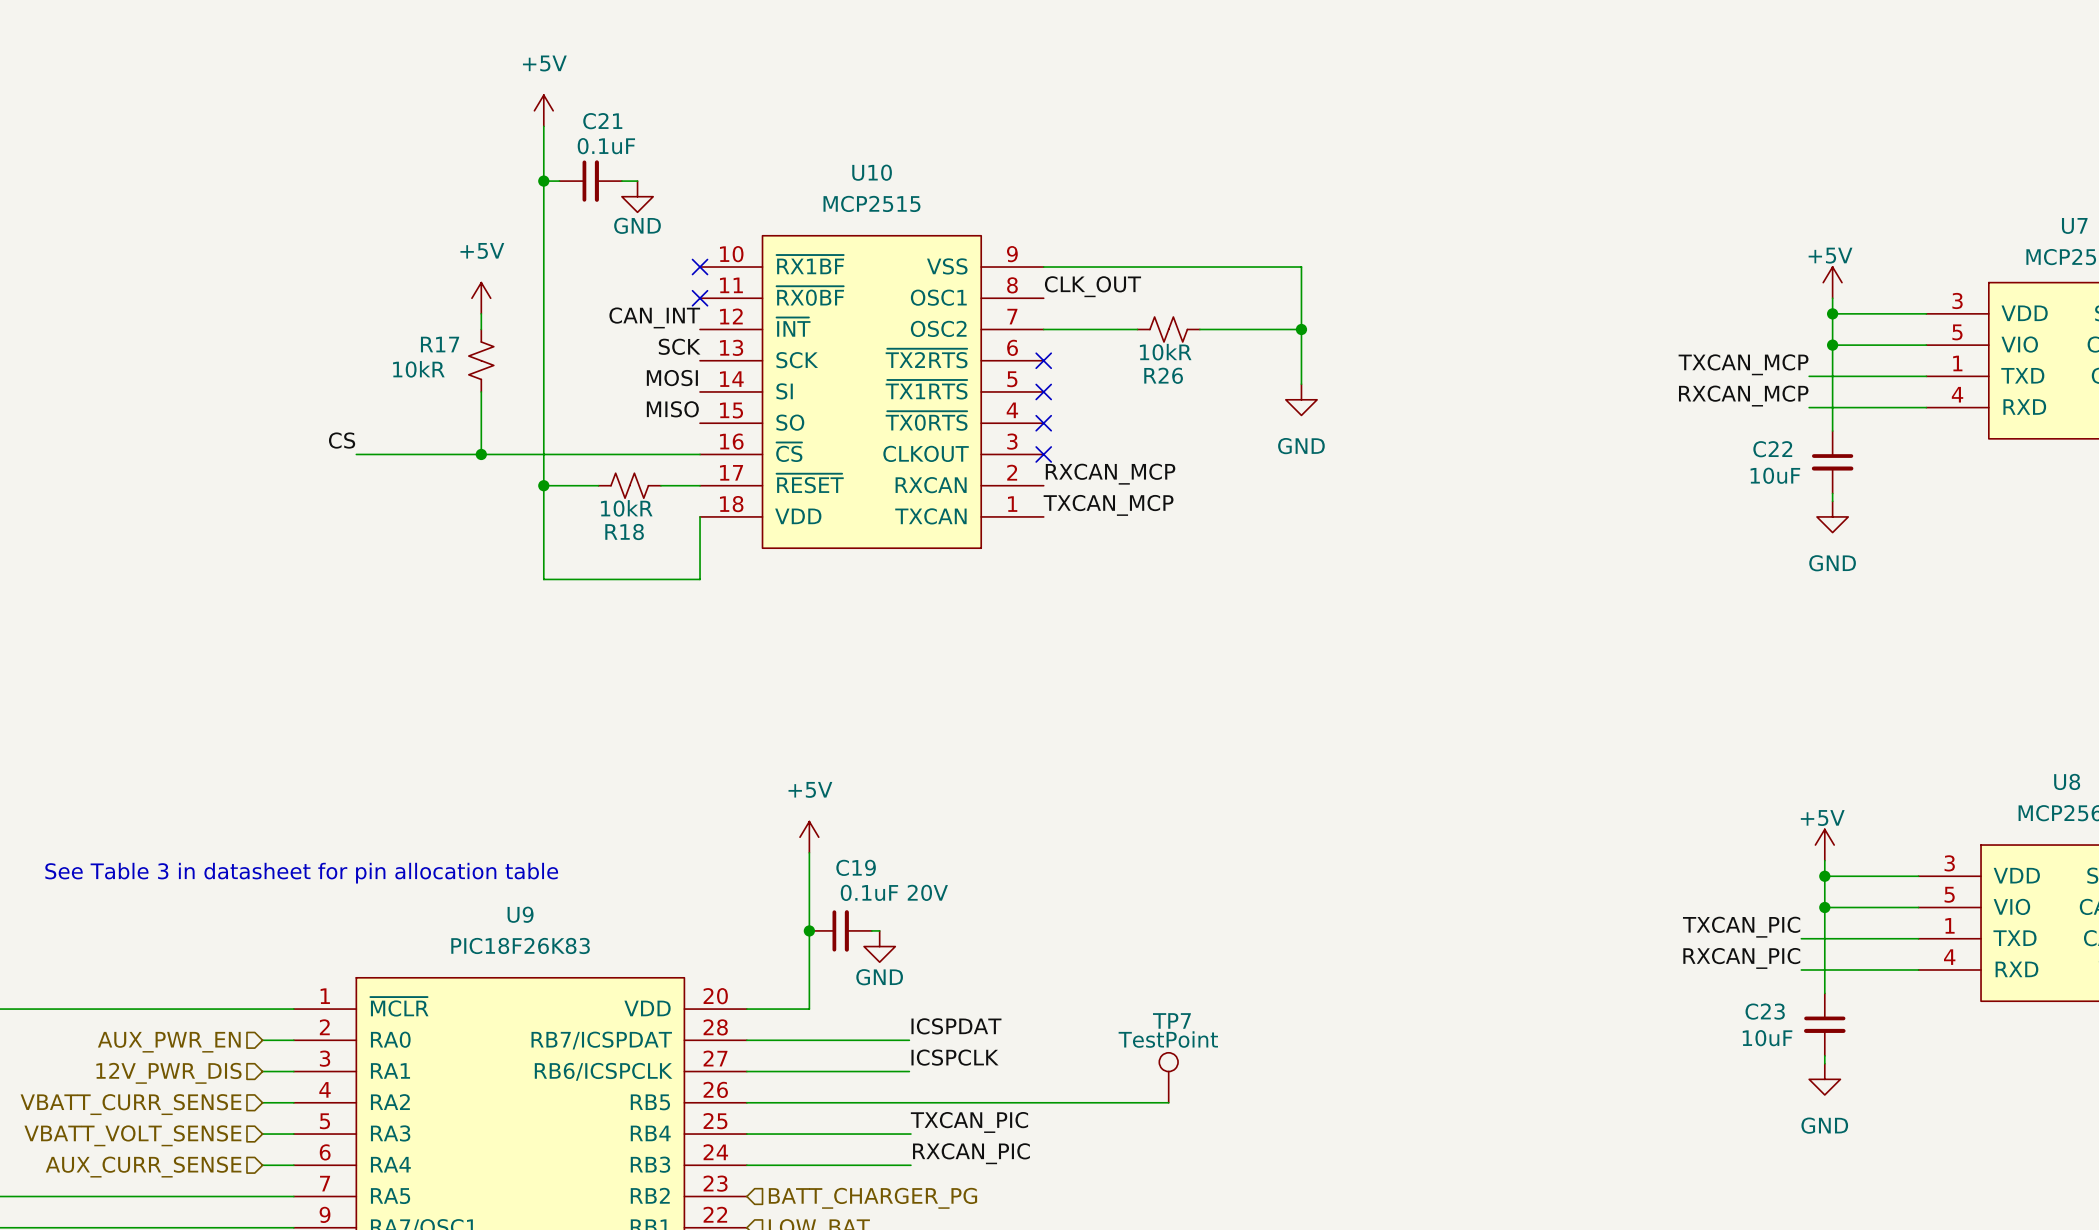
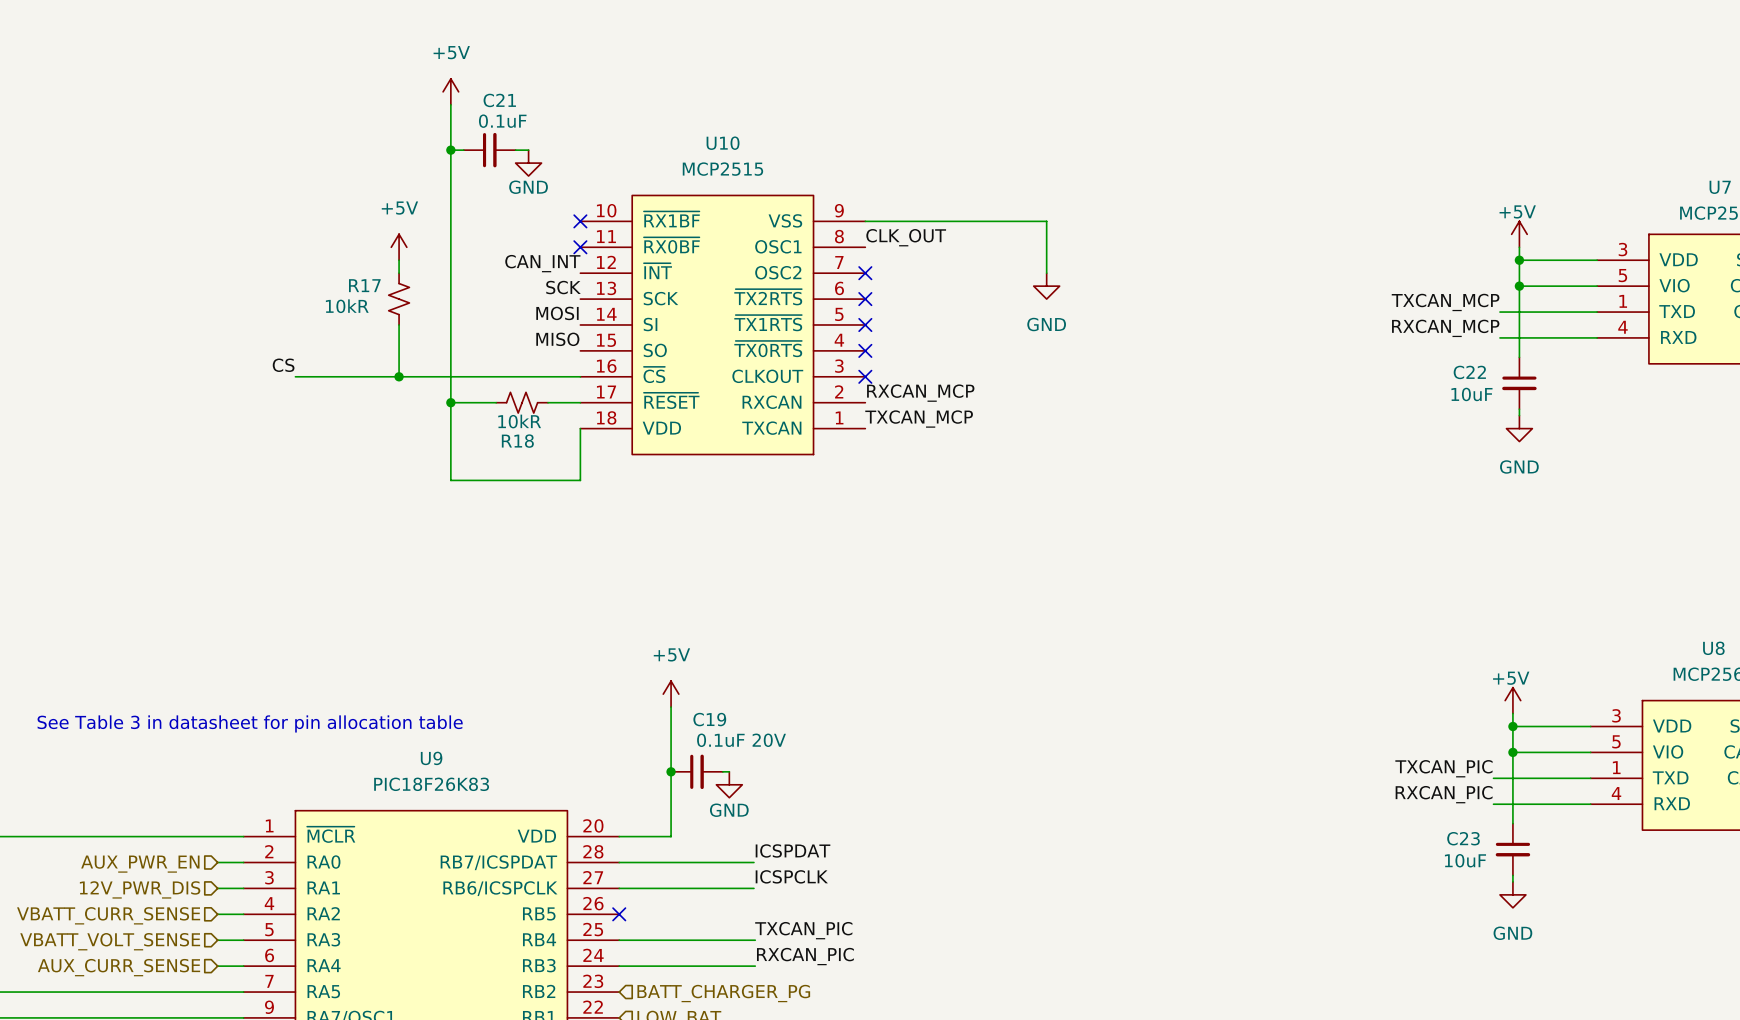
wire: (1262, 267) (1301, 267) (1301, 384) -> (1046, 221) (1046, 273)
wire: (1043, 329) (1137, 329) -> none
no-connect mark: none -> (865, 273)
R26: 10kR (1168, 329) -> none
wire: (1199, 329) (1301, 329) -> none
junction: (1301, 329) -> none
power symbol position: GND (1301, 399) -> GND (1046, 286)
TP7: TestPoint (1168, 1077) -> none
wire: (746, 1102) (1168, 1102) -> none
no-connect mark: none -> (619, 914)

